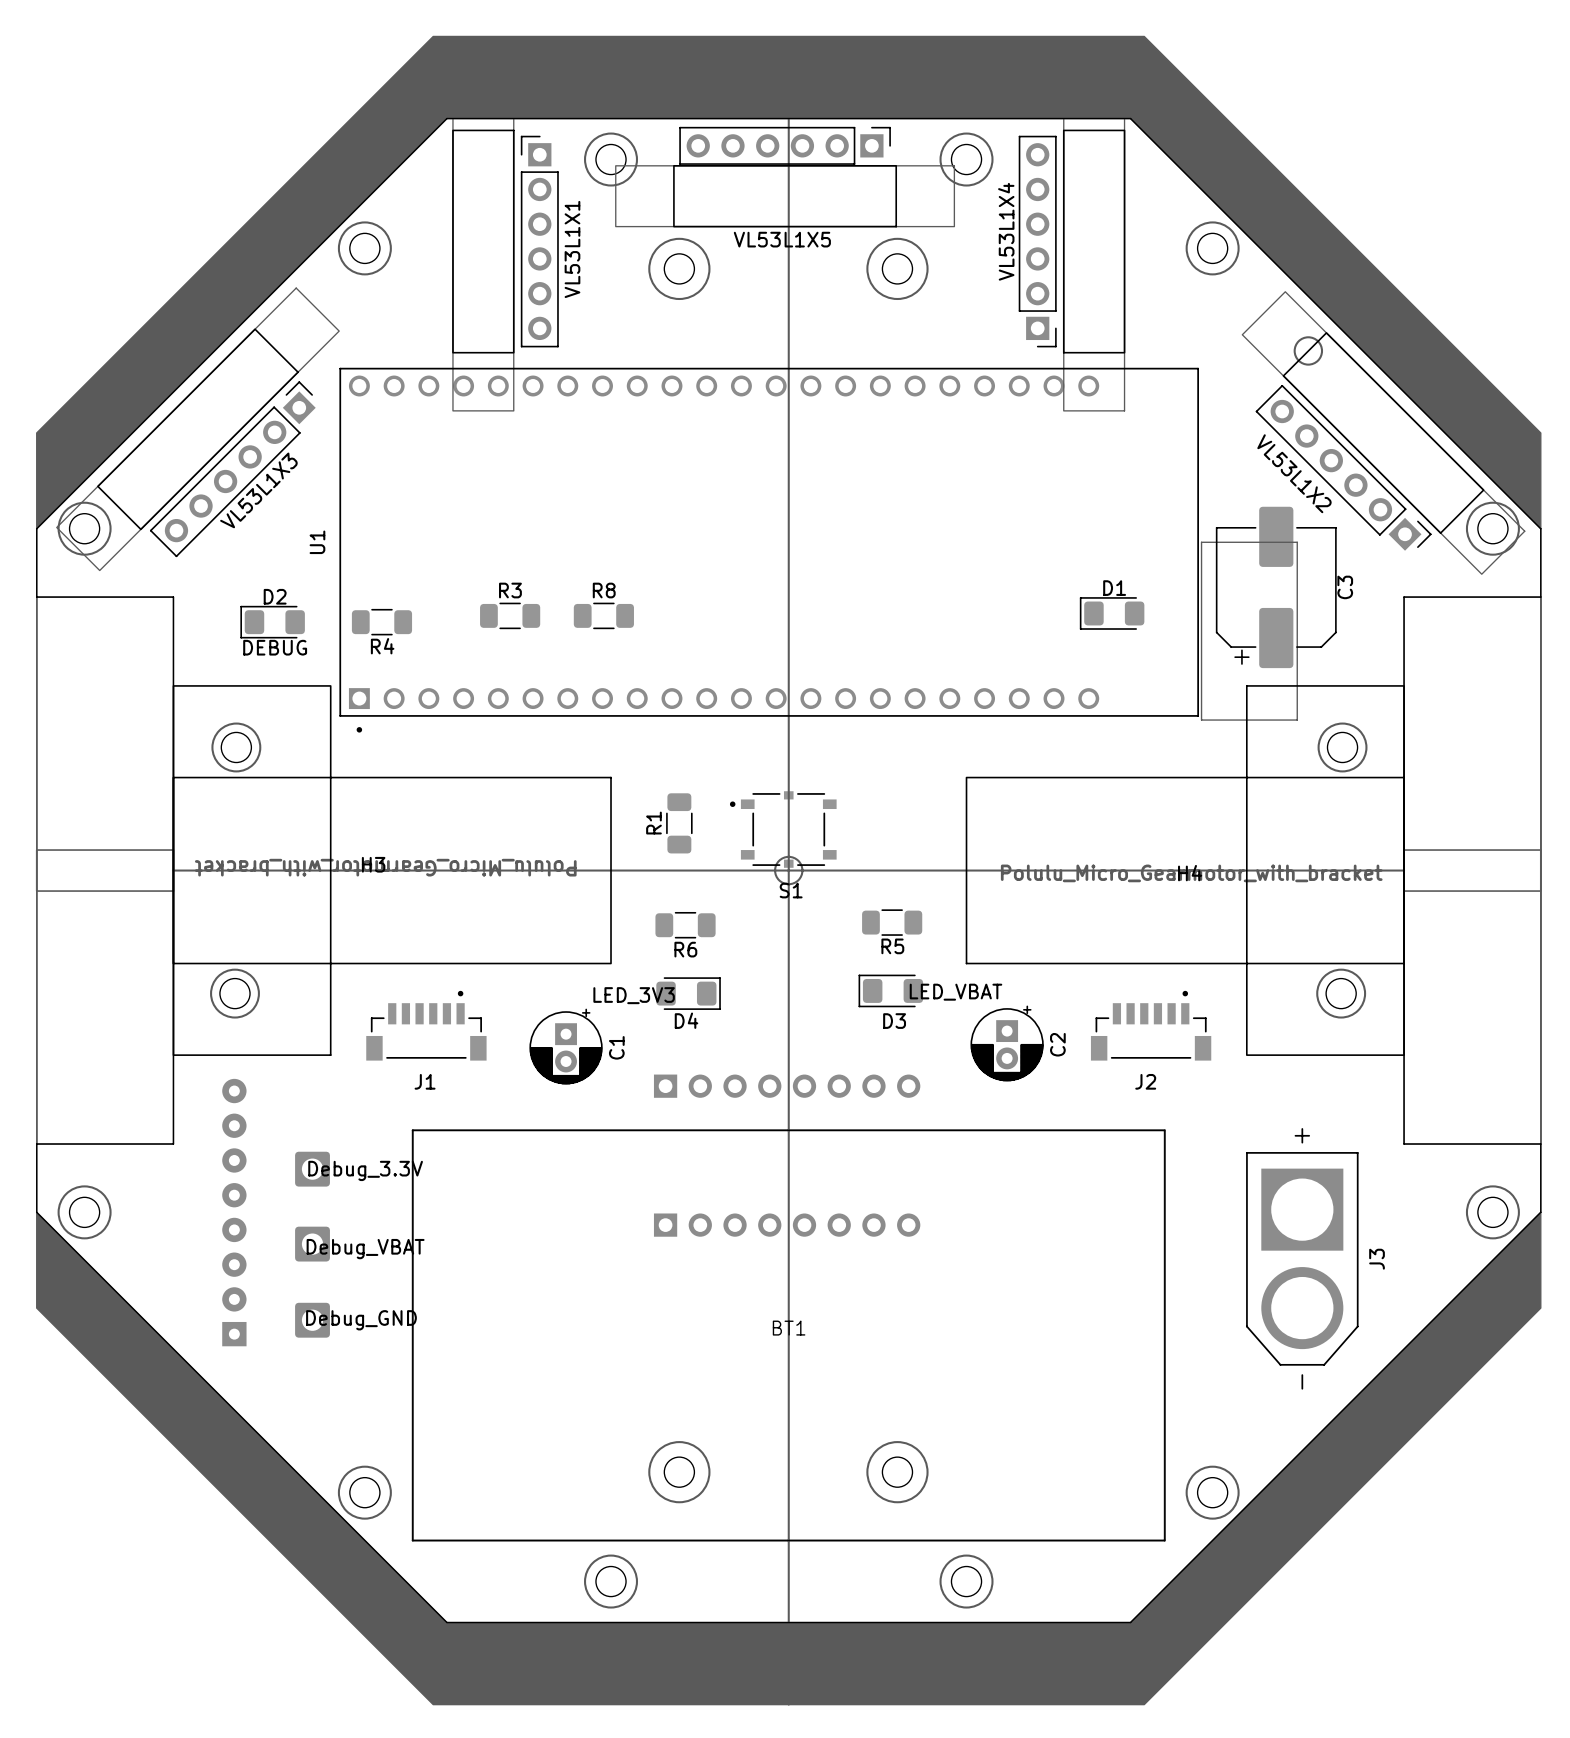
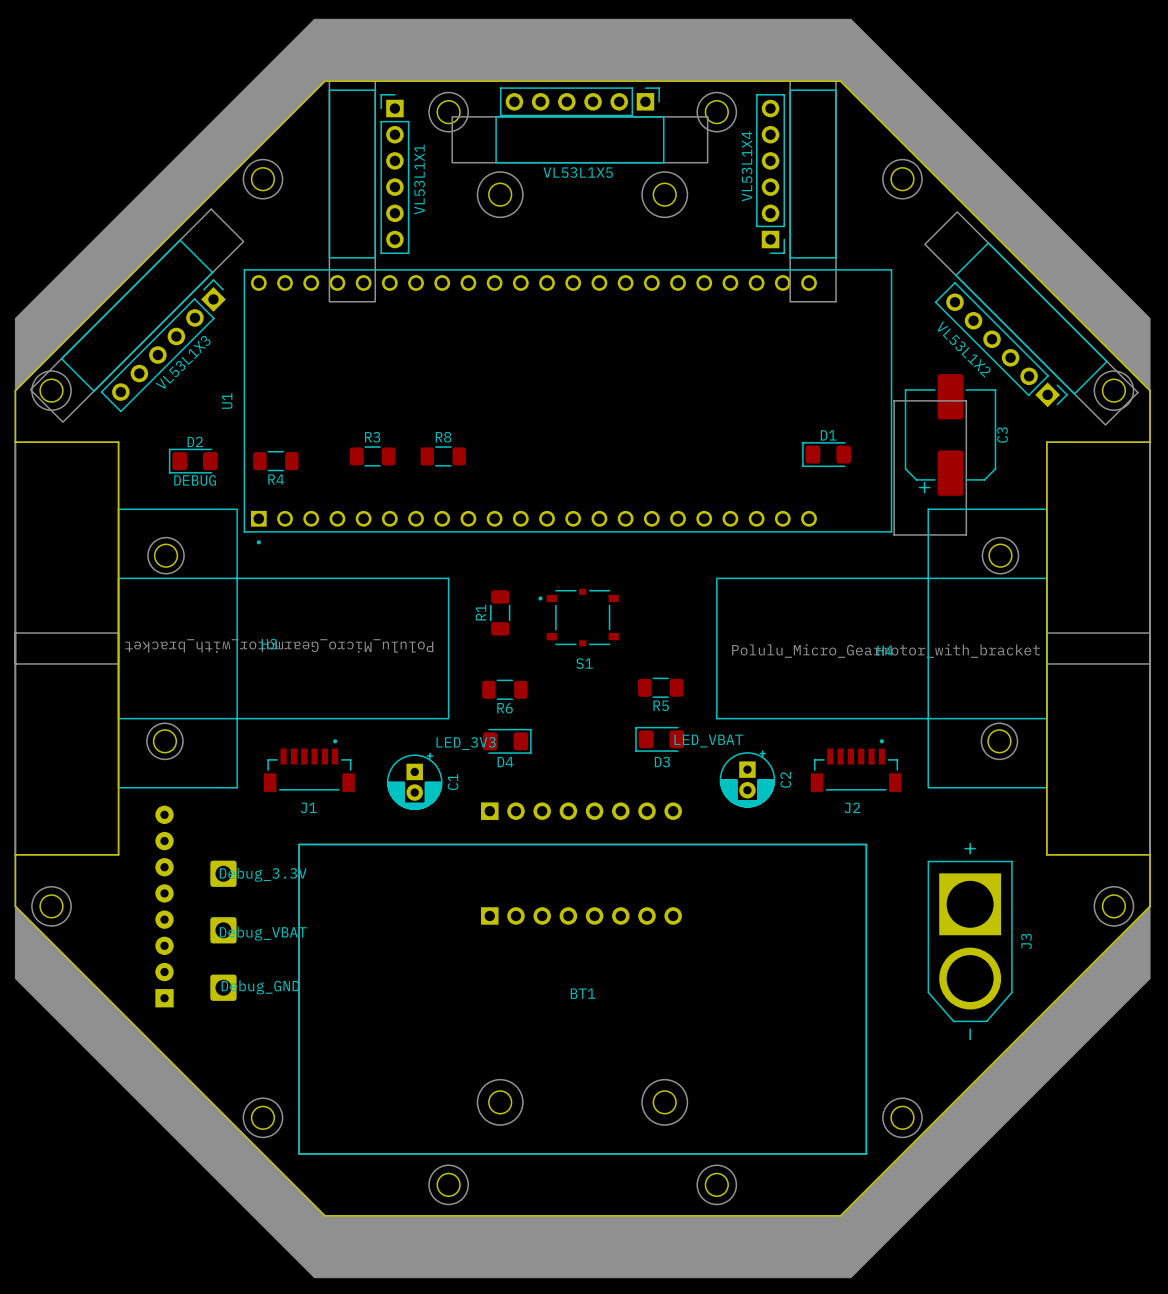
line: (788, 63) (788, 1704) -> none
drawing: [1293, 336, 1324, 366] -> none
drawing: [774, 855, 804, 886] -> none
line: (173, 870) (1404, 870) -> none

